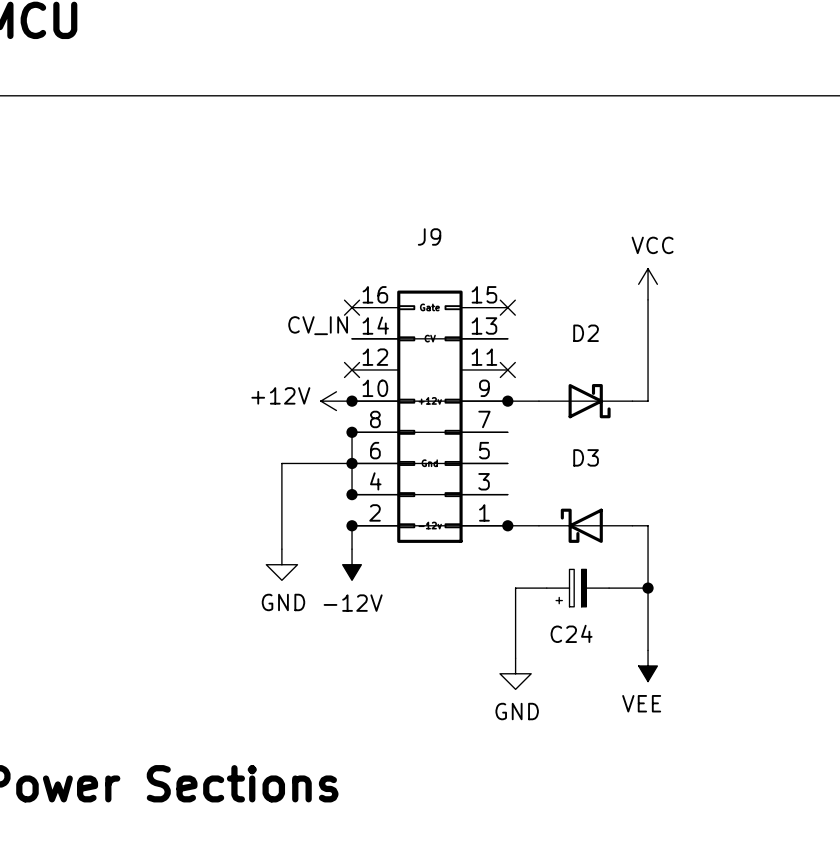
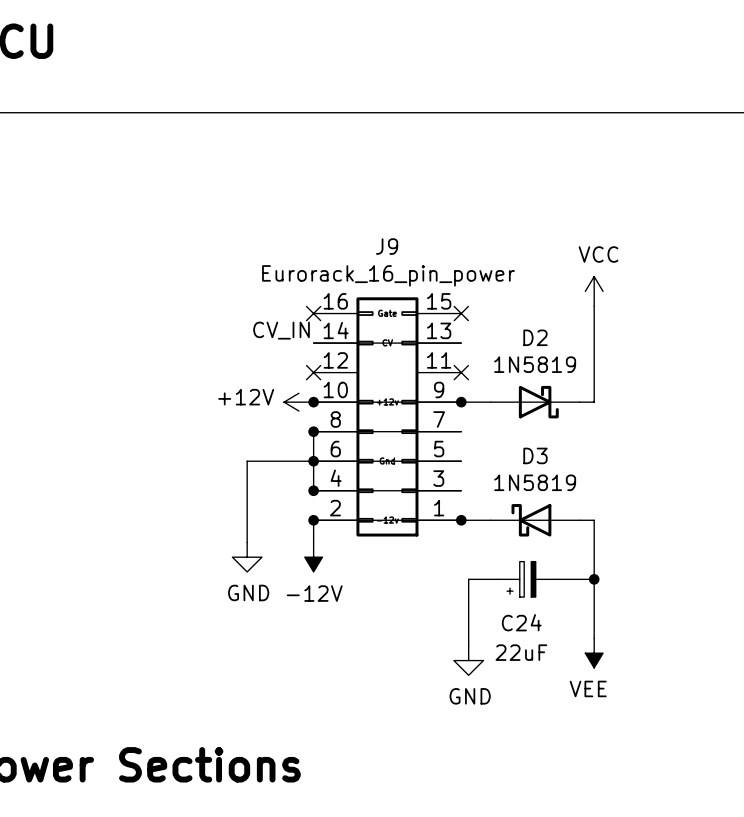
J9 value: none -> Eurorack_16_pin_power (388, 275)
D2 value: none -> 1N5819 (535, 364)
D3 value: none -> 1N5819 (535, 482)
C24 value: none -> 22uF (521, 652)

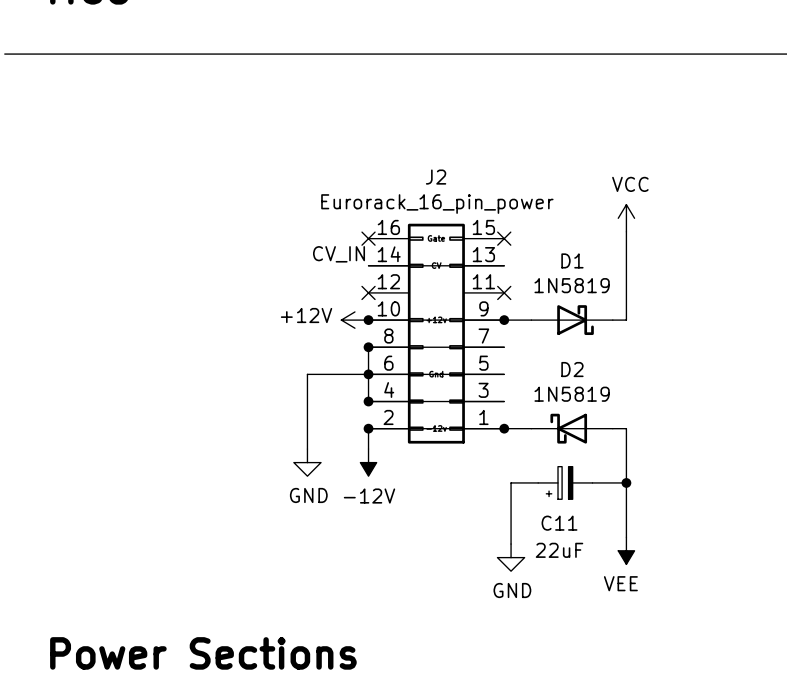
J9 name: J9 (387, 246) -> J2 (436, 177)
D2 name: D2 (535, 337) -> D1 (572, 260)
D3 name: D3 (535, 455) -> D2 (572, 369)
C24 name: C24 (521, 622) -> C11 (559, 523)

